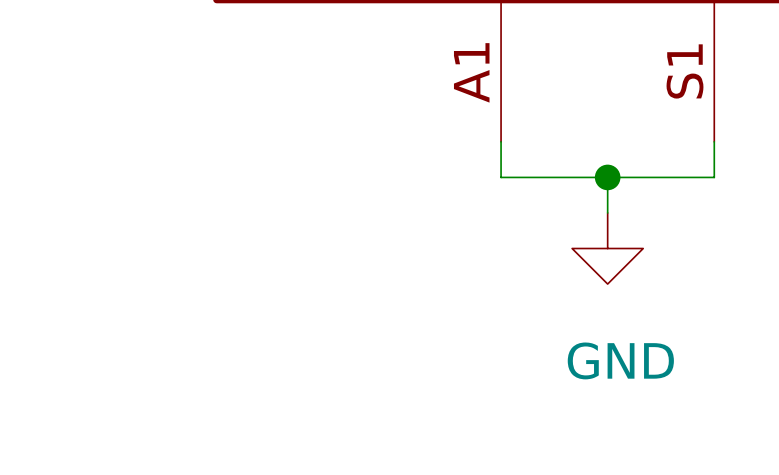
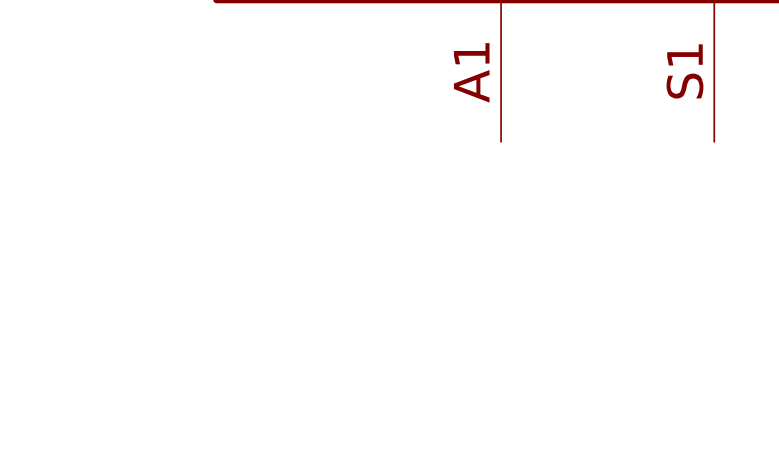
wire: (501, 141) (501, 177) (714, 177) (714, 141) -> none
wire: (607, 177) (607, 212) -> none
junction: (607, 177) -> none
power symbol: GND (607, 248) -> none

